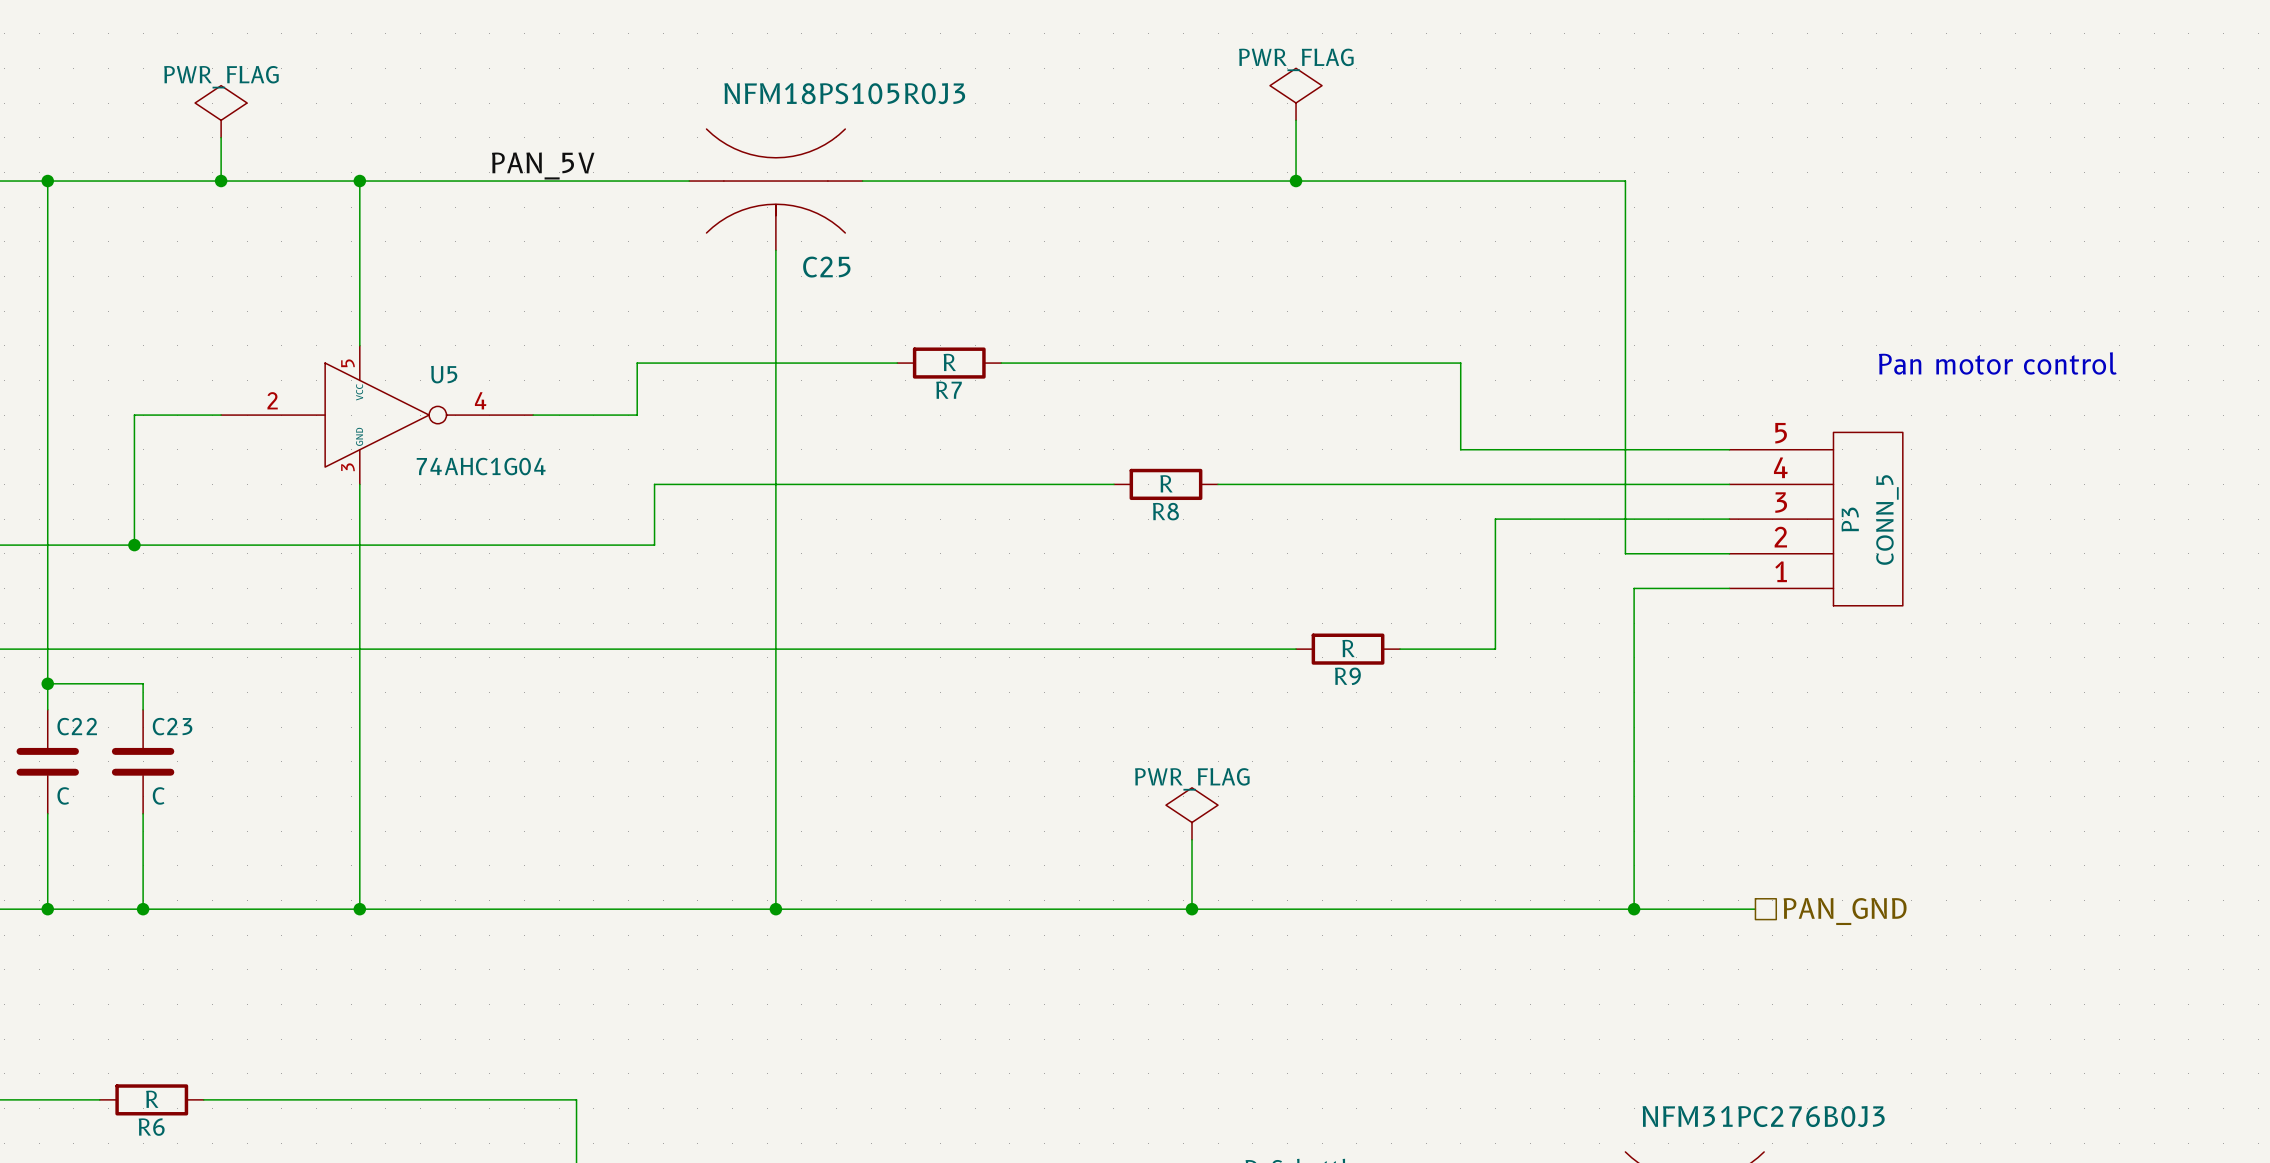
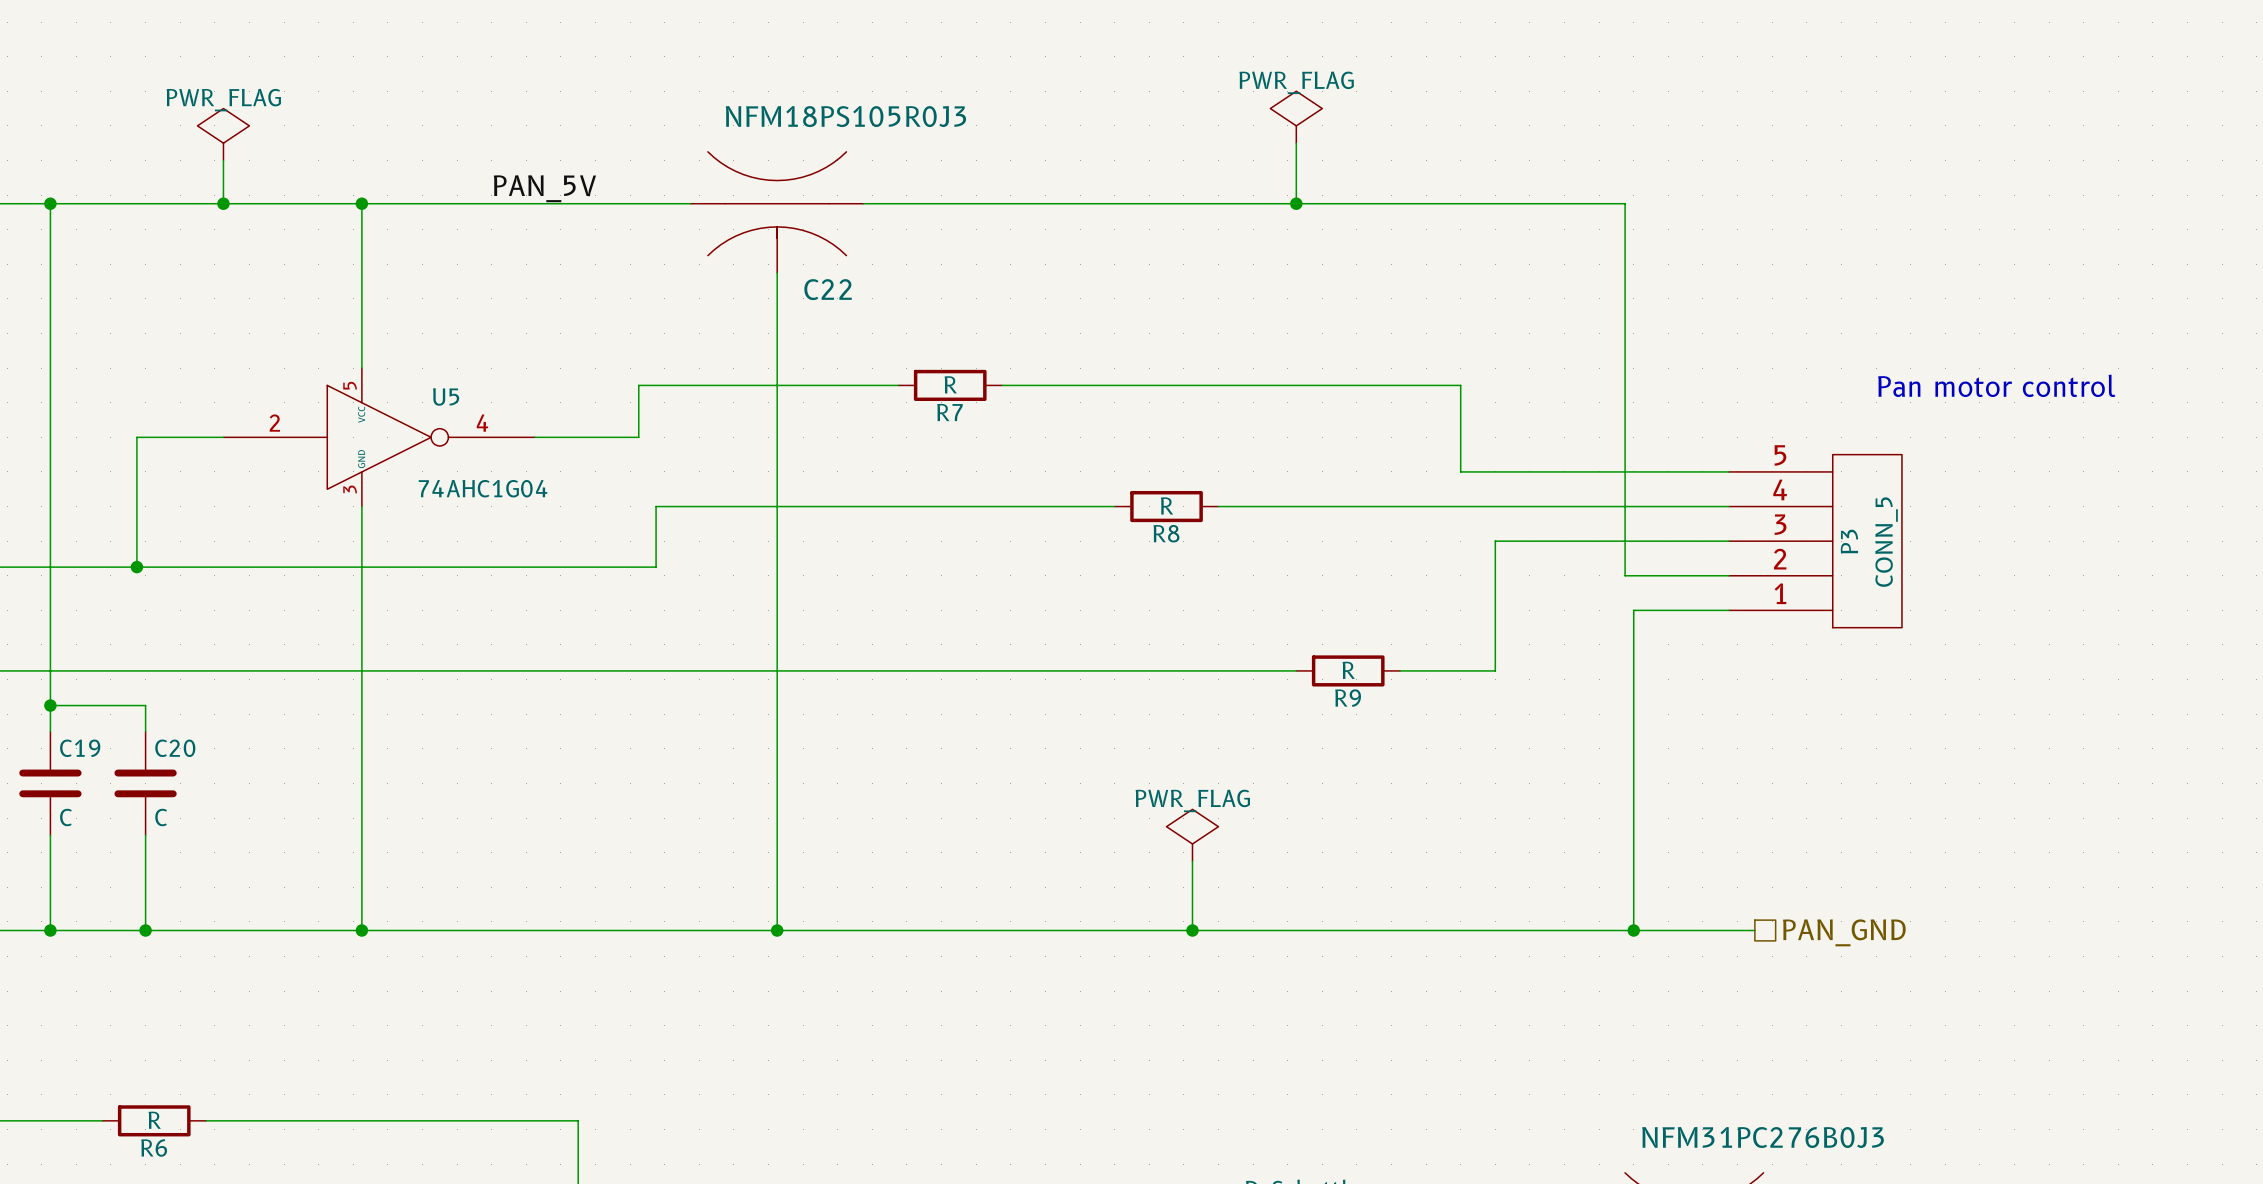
C25 name: C25 (826, 267) -> C22 (828, 289)
C22 name: C22 (77, 726) -> C19 (80, 748)
C23 name: C23 (172, 726) -> C20 (175, 748)

